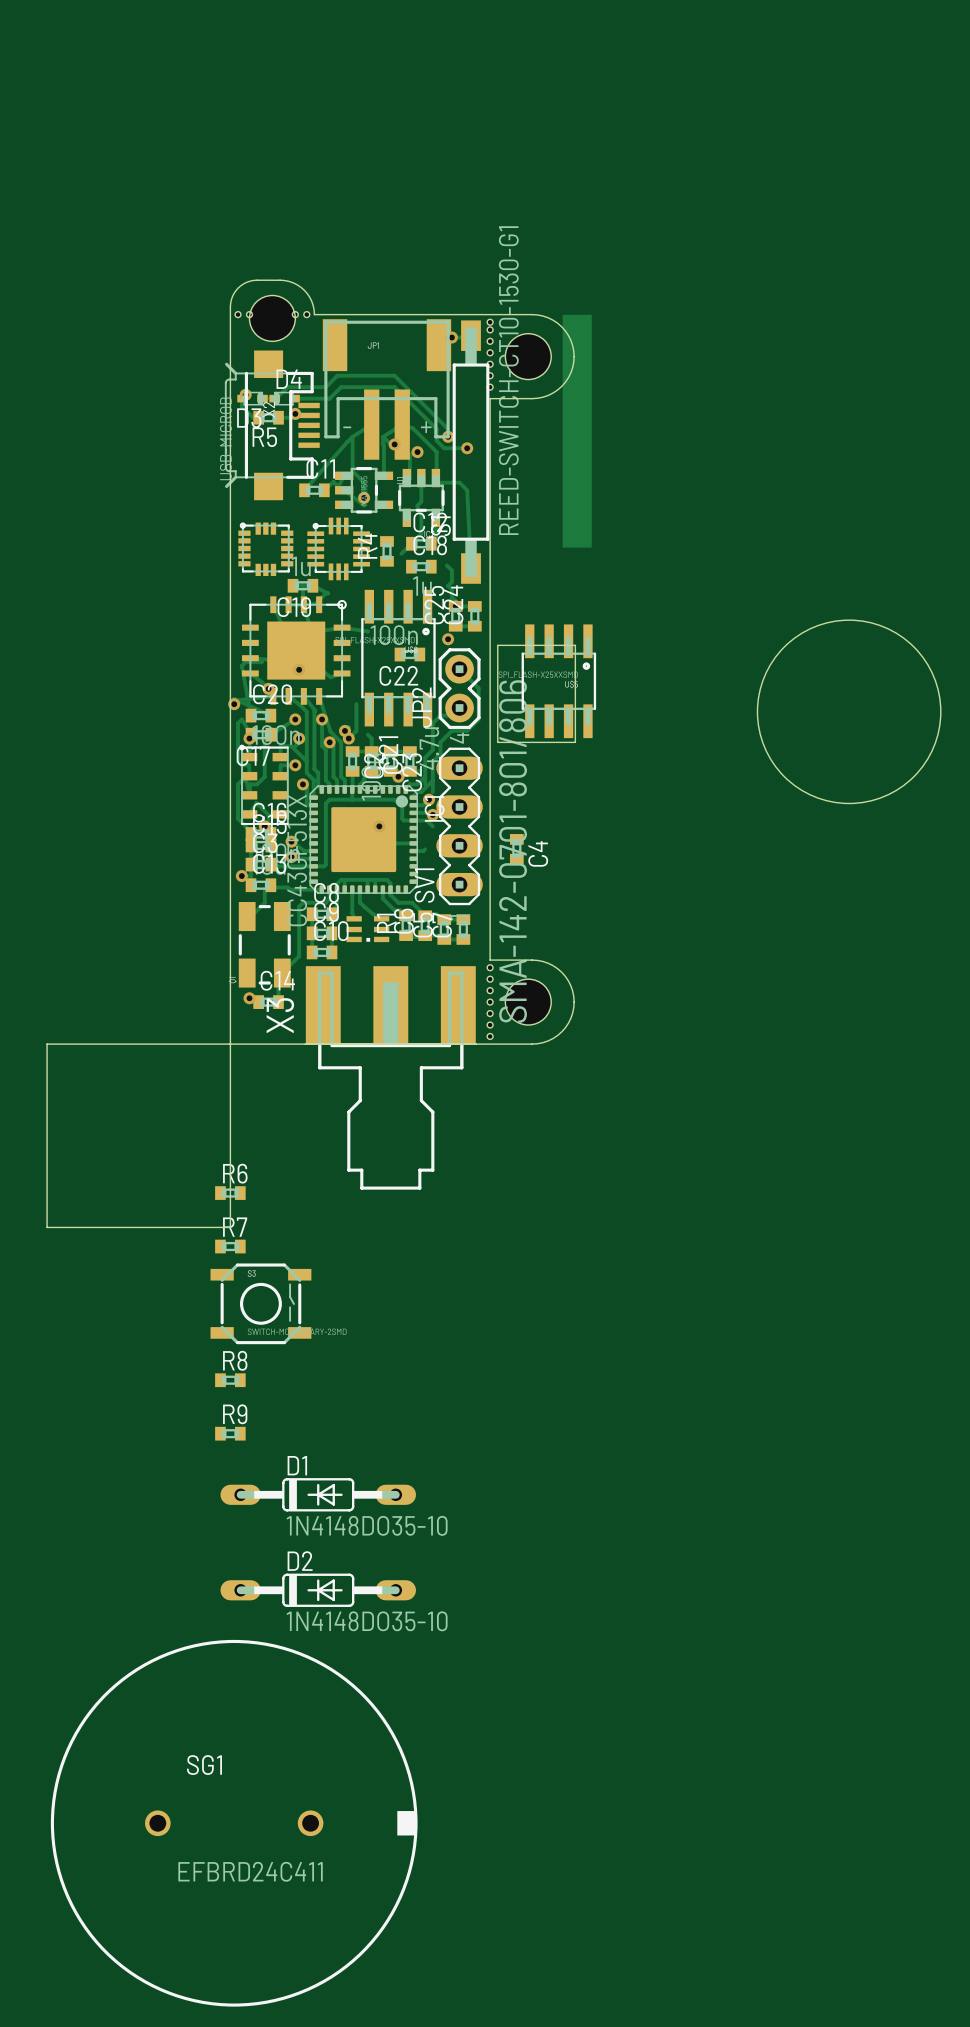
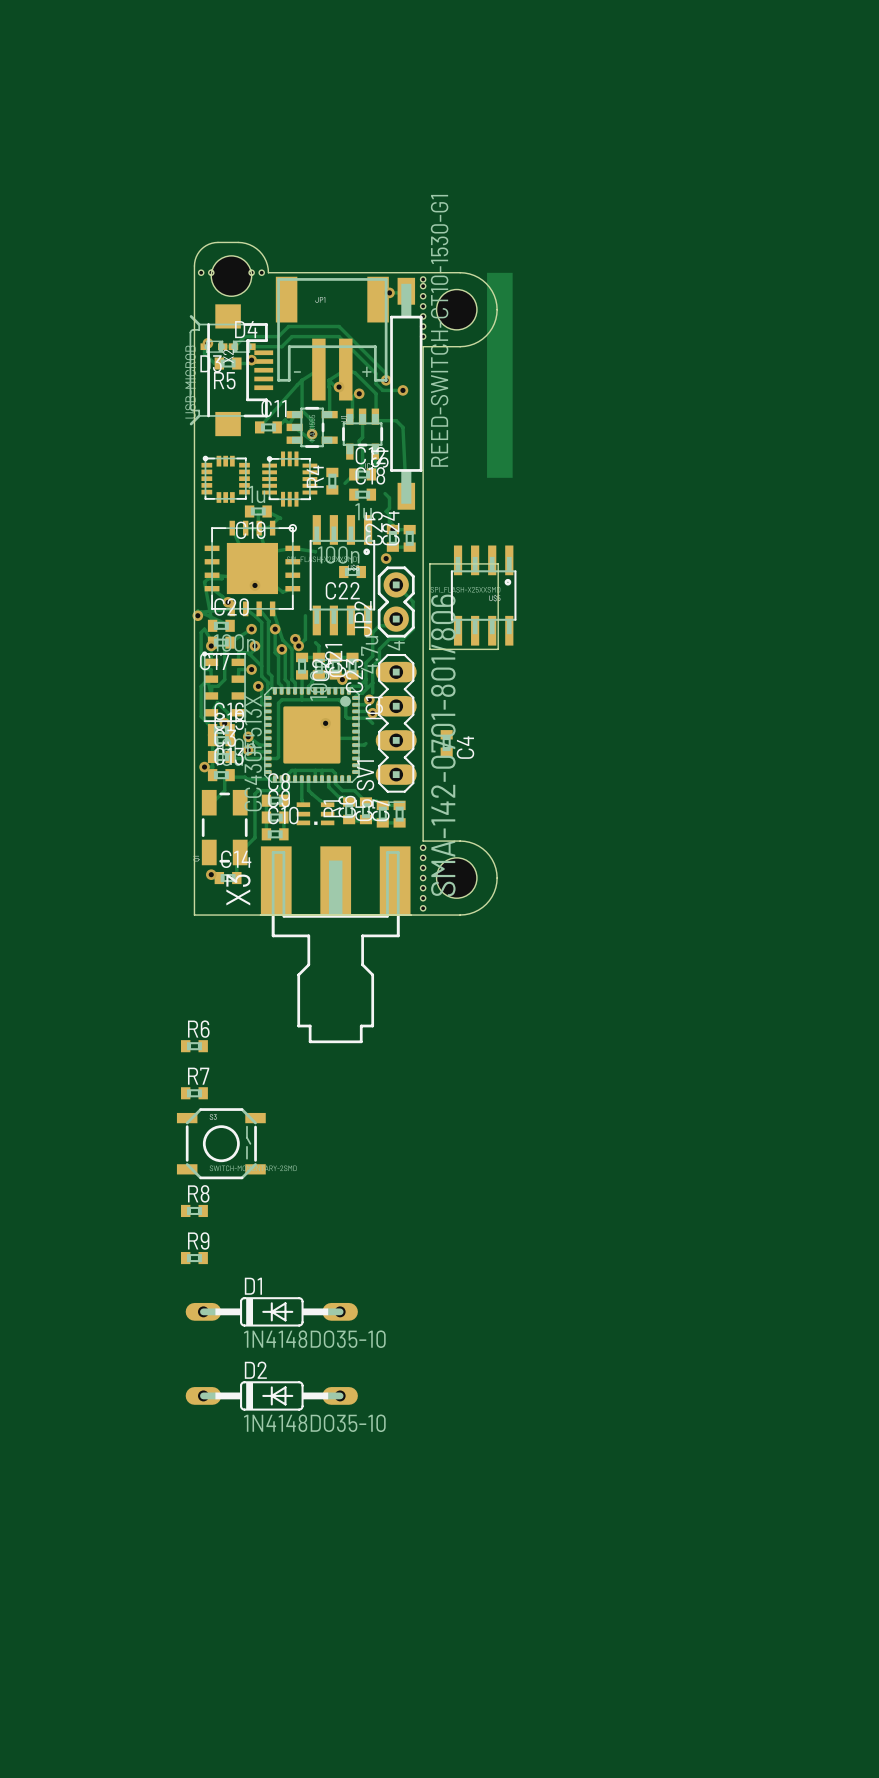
round board edge: [757, 620, 941, 804] -> none
board edge: (47, 1044) (230, 1044) (230, 1227) (47, 1227) (47, 1044) -> none
SG1: EFBRD24C411 (234, 1823) -> none

